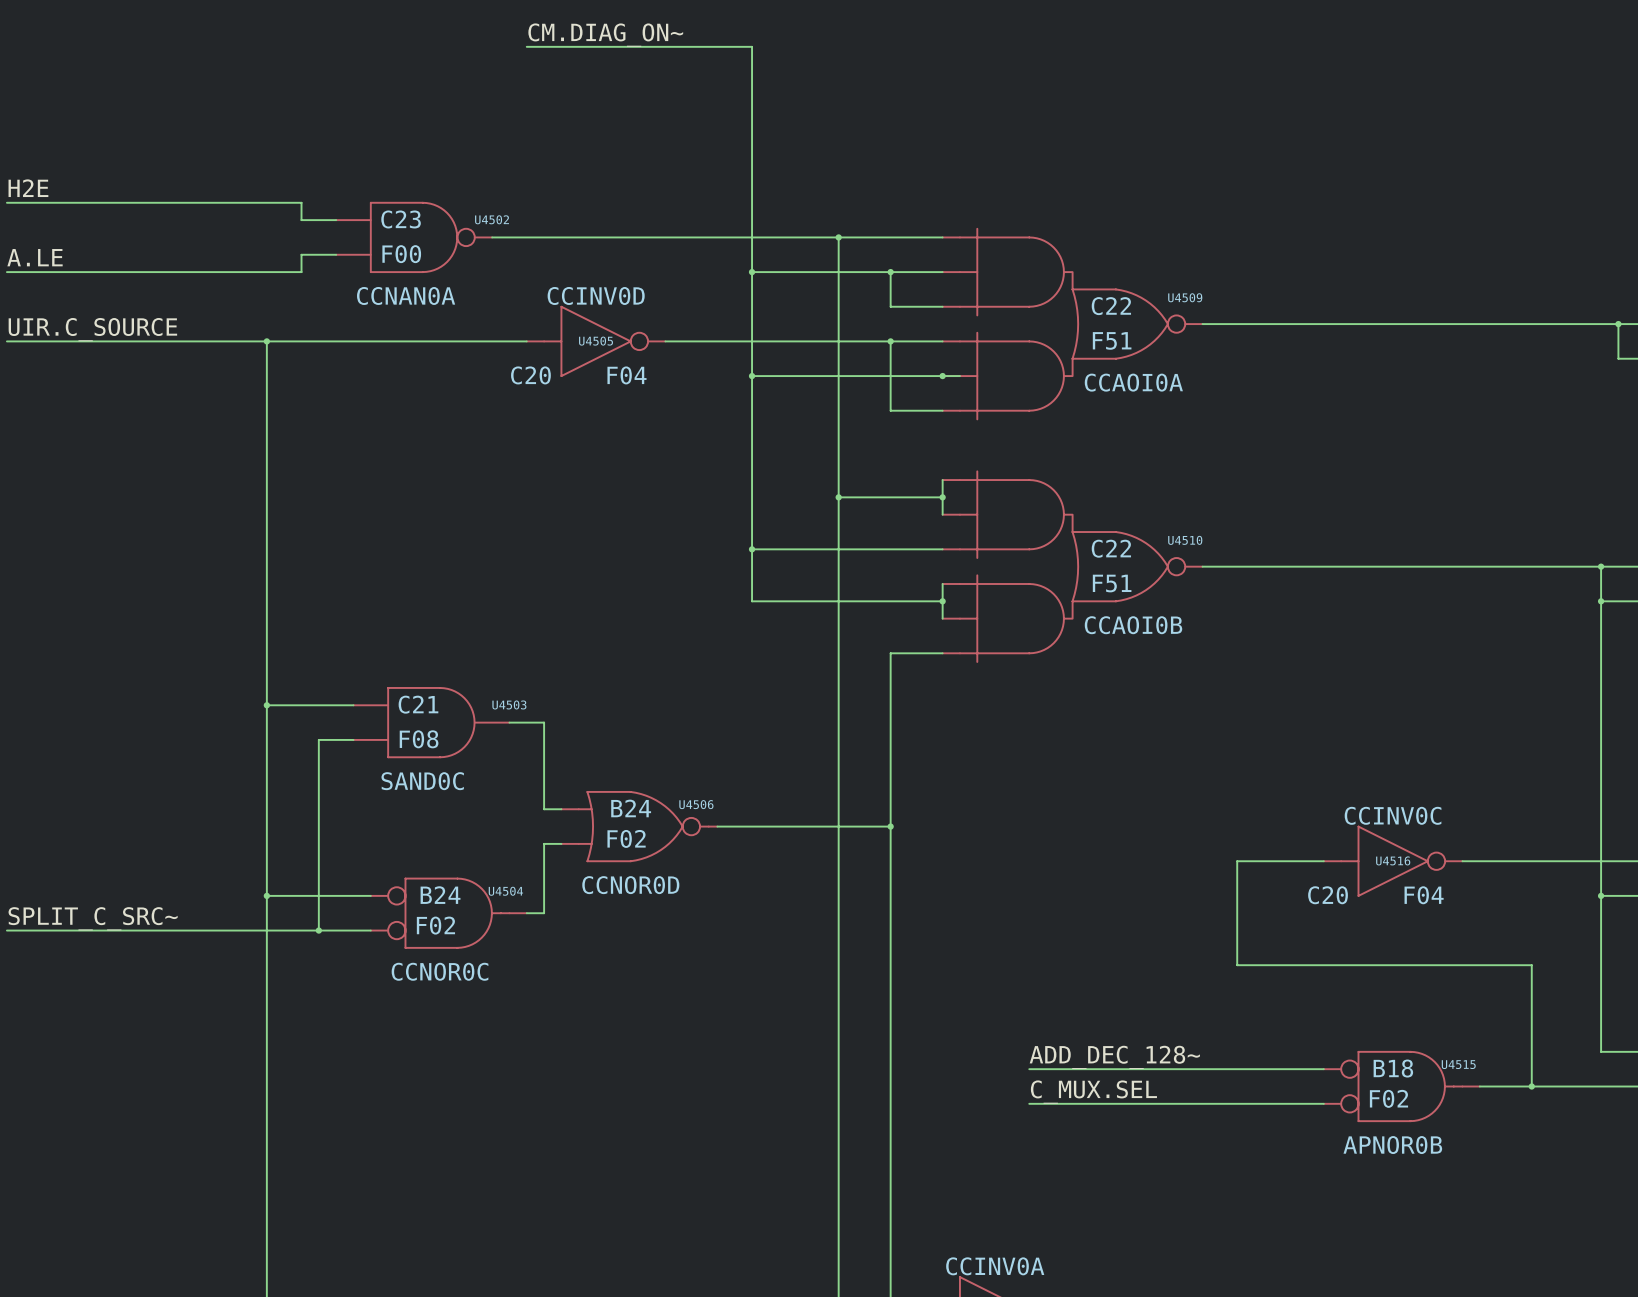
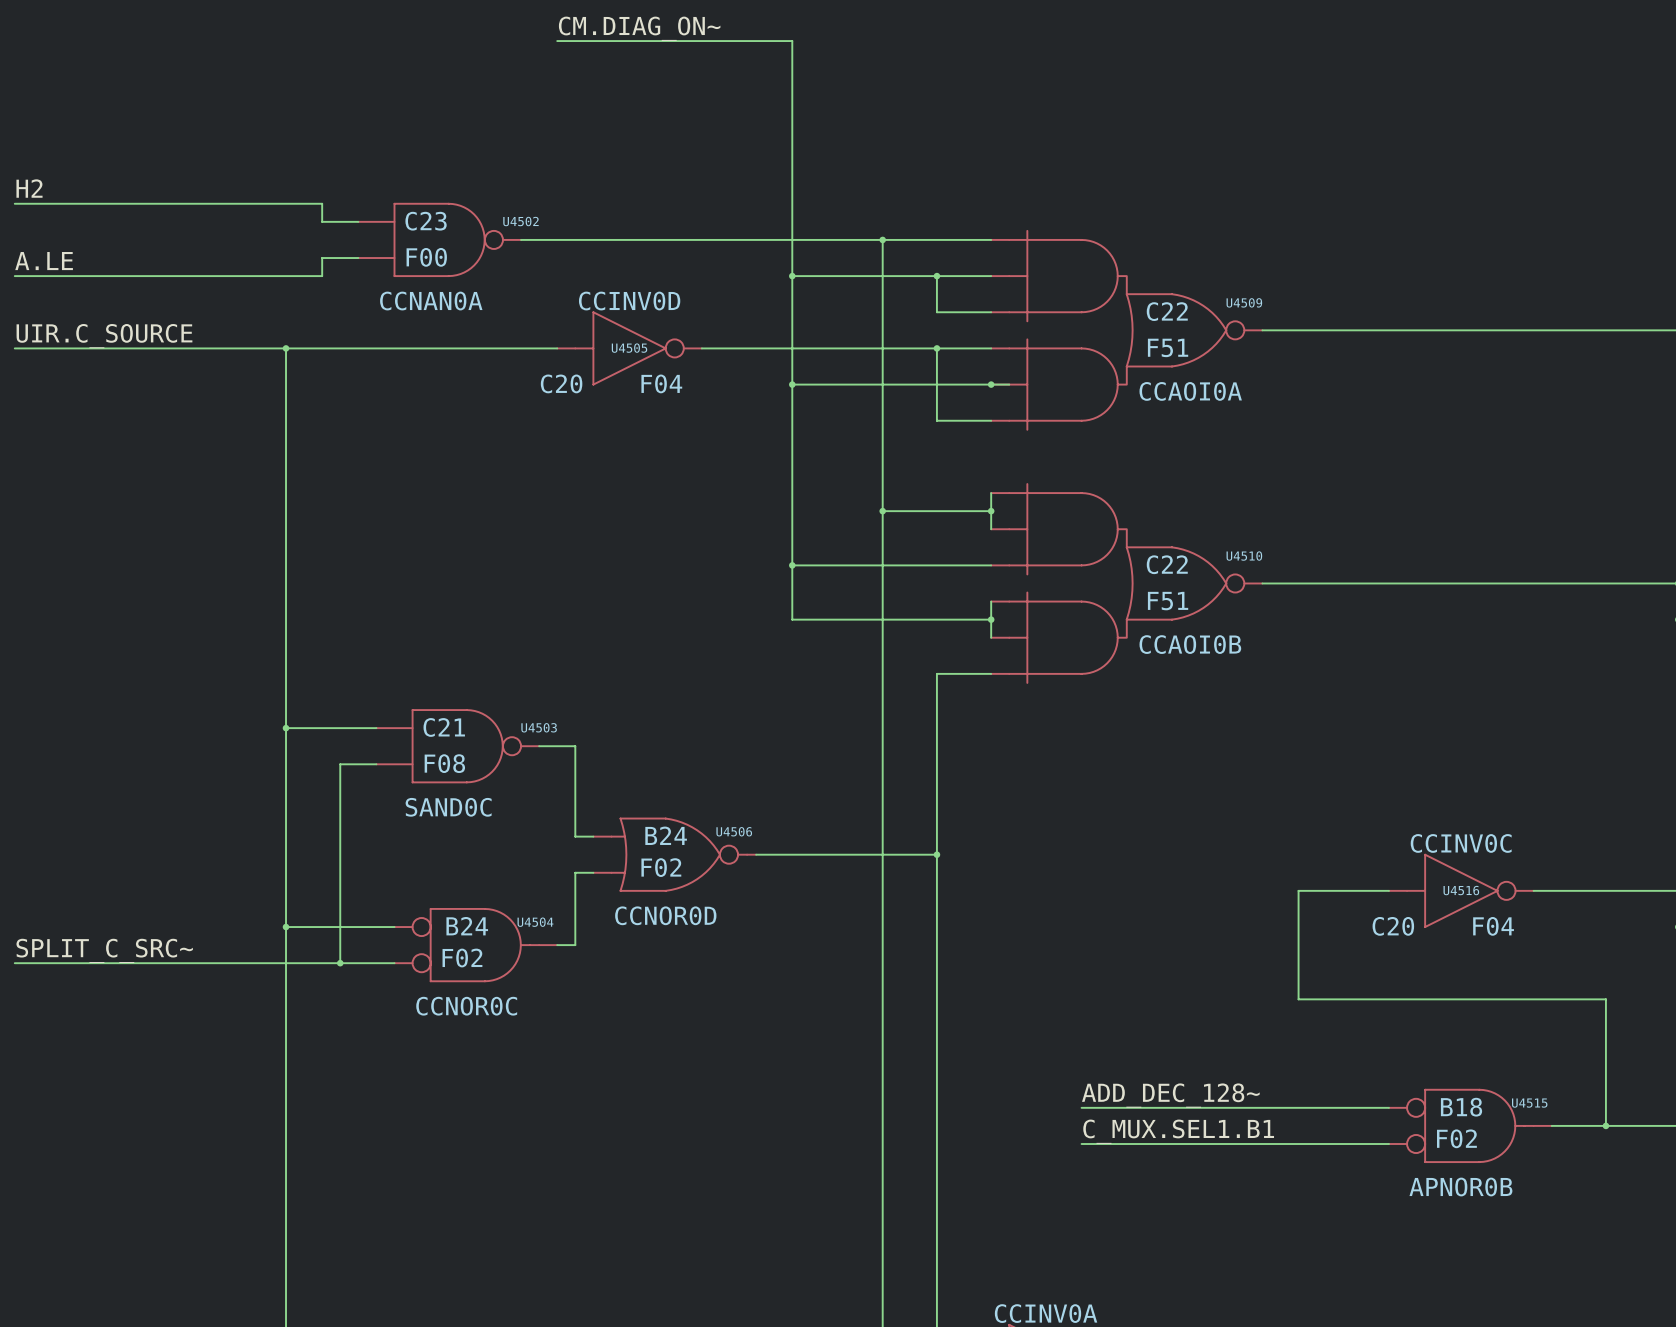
label: H2E (28, 188) -> H2 (29, 188)
U4503 symbol: [353, 687, 510, 758] -> [376, 709, 540, 783]
label: C_MUX.SEL (1093, 1092) -> C_MUX.SEL1.B1 (1178, 1131)

